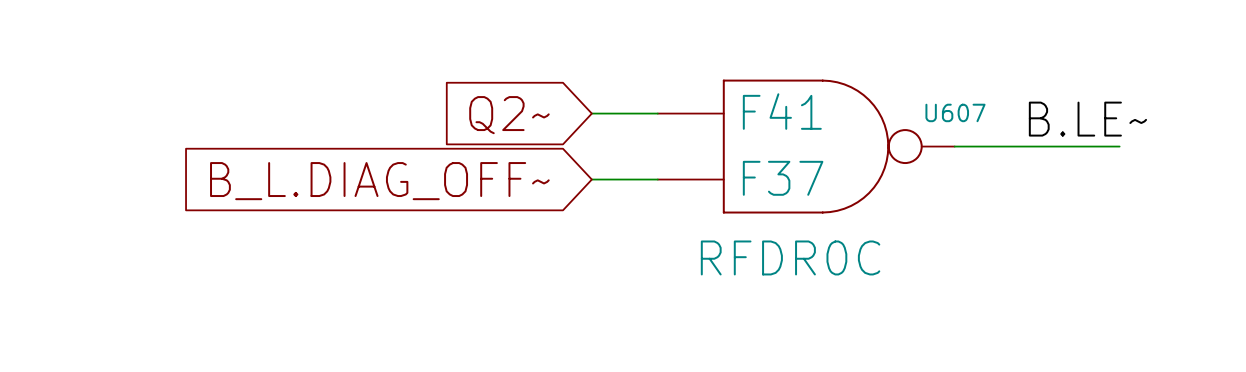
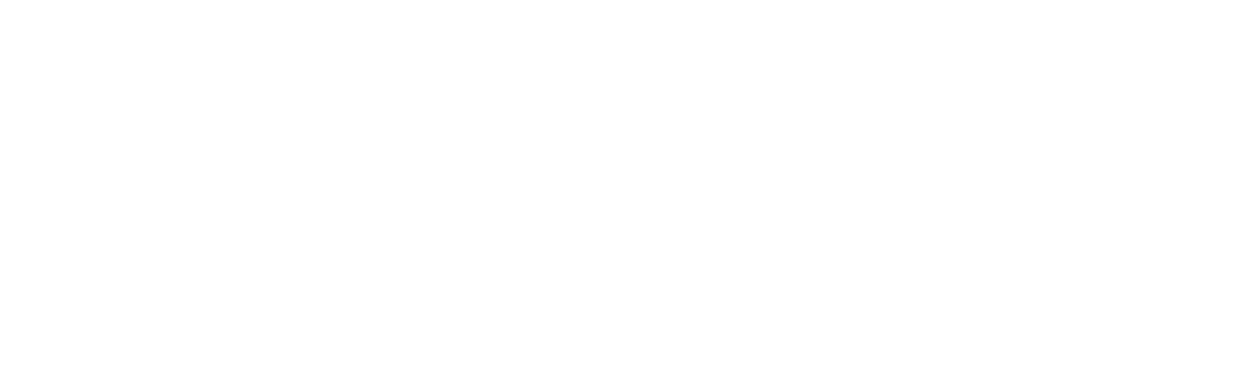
wire: (591, 113) (657, 113) -> none
global label: Q2~ (509, 115) -> none
label: B.LE~ (1087, 119) -> none
U607: F37 (806, 146) -> none
wire: (954, 146) (1119, 146) -> none
wire: (591, 179) (657, 179) -> none
global label: B_L.DIAG_OFF~ (379, 181) -> none

